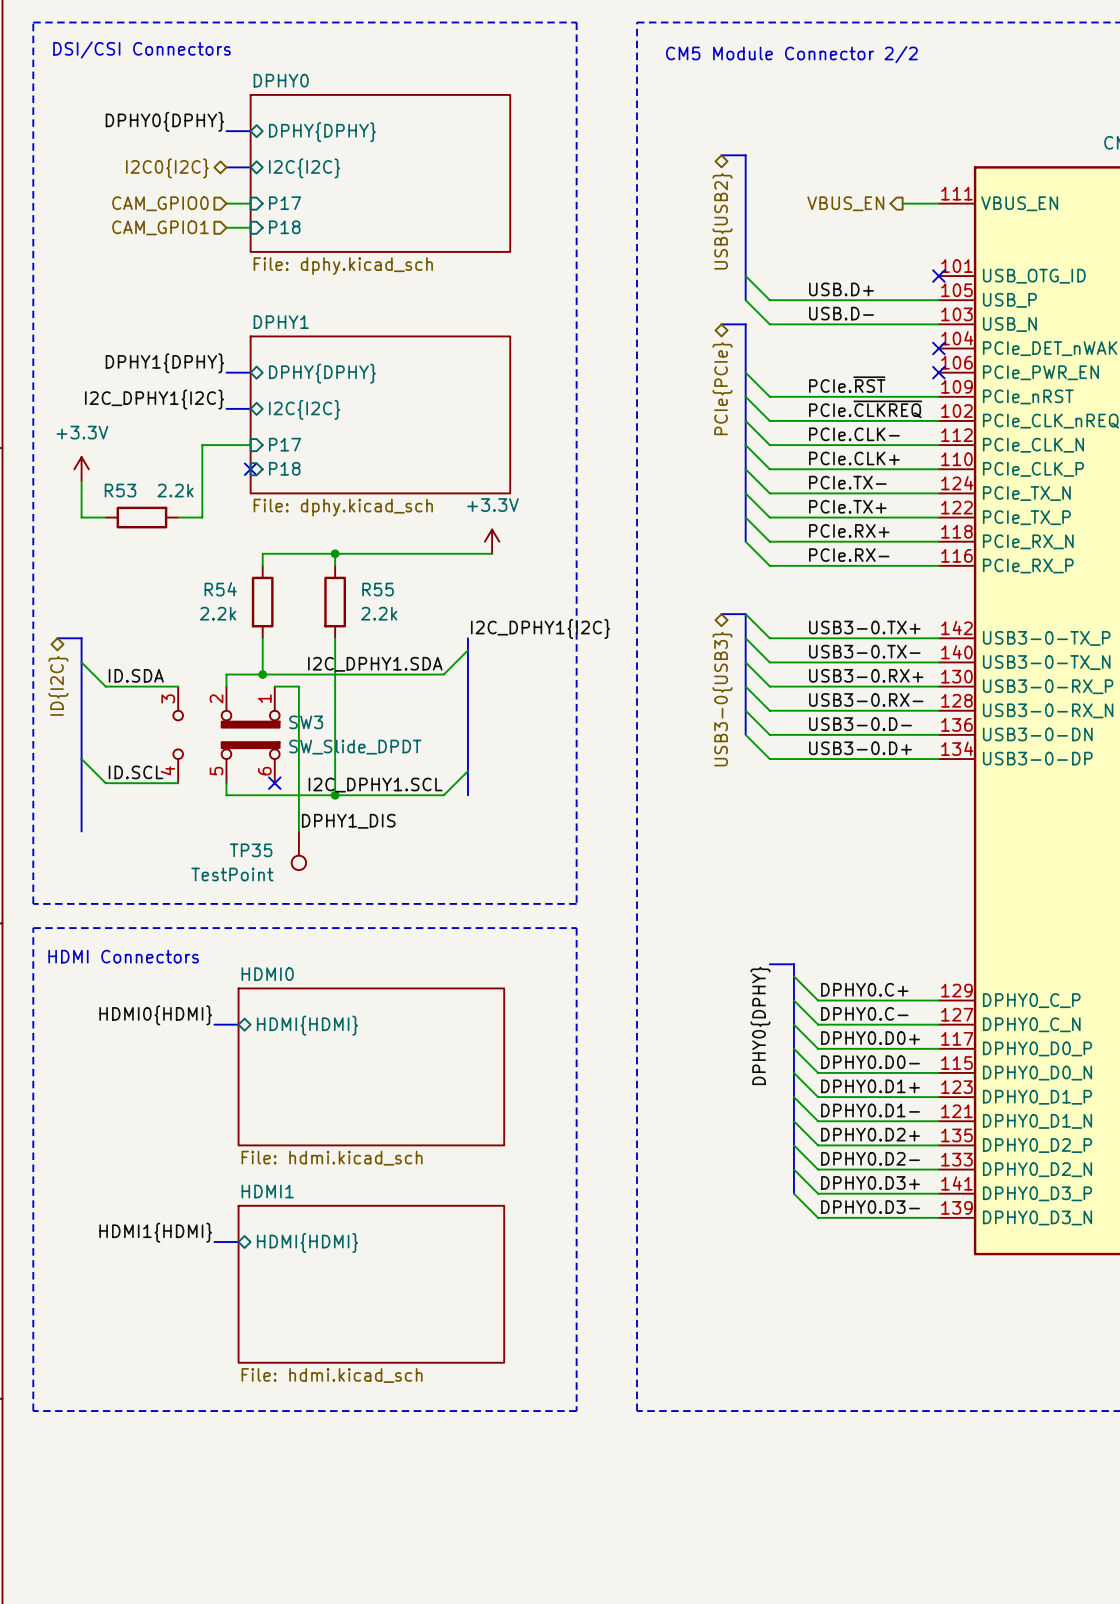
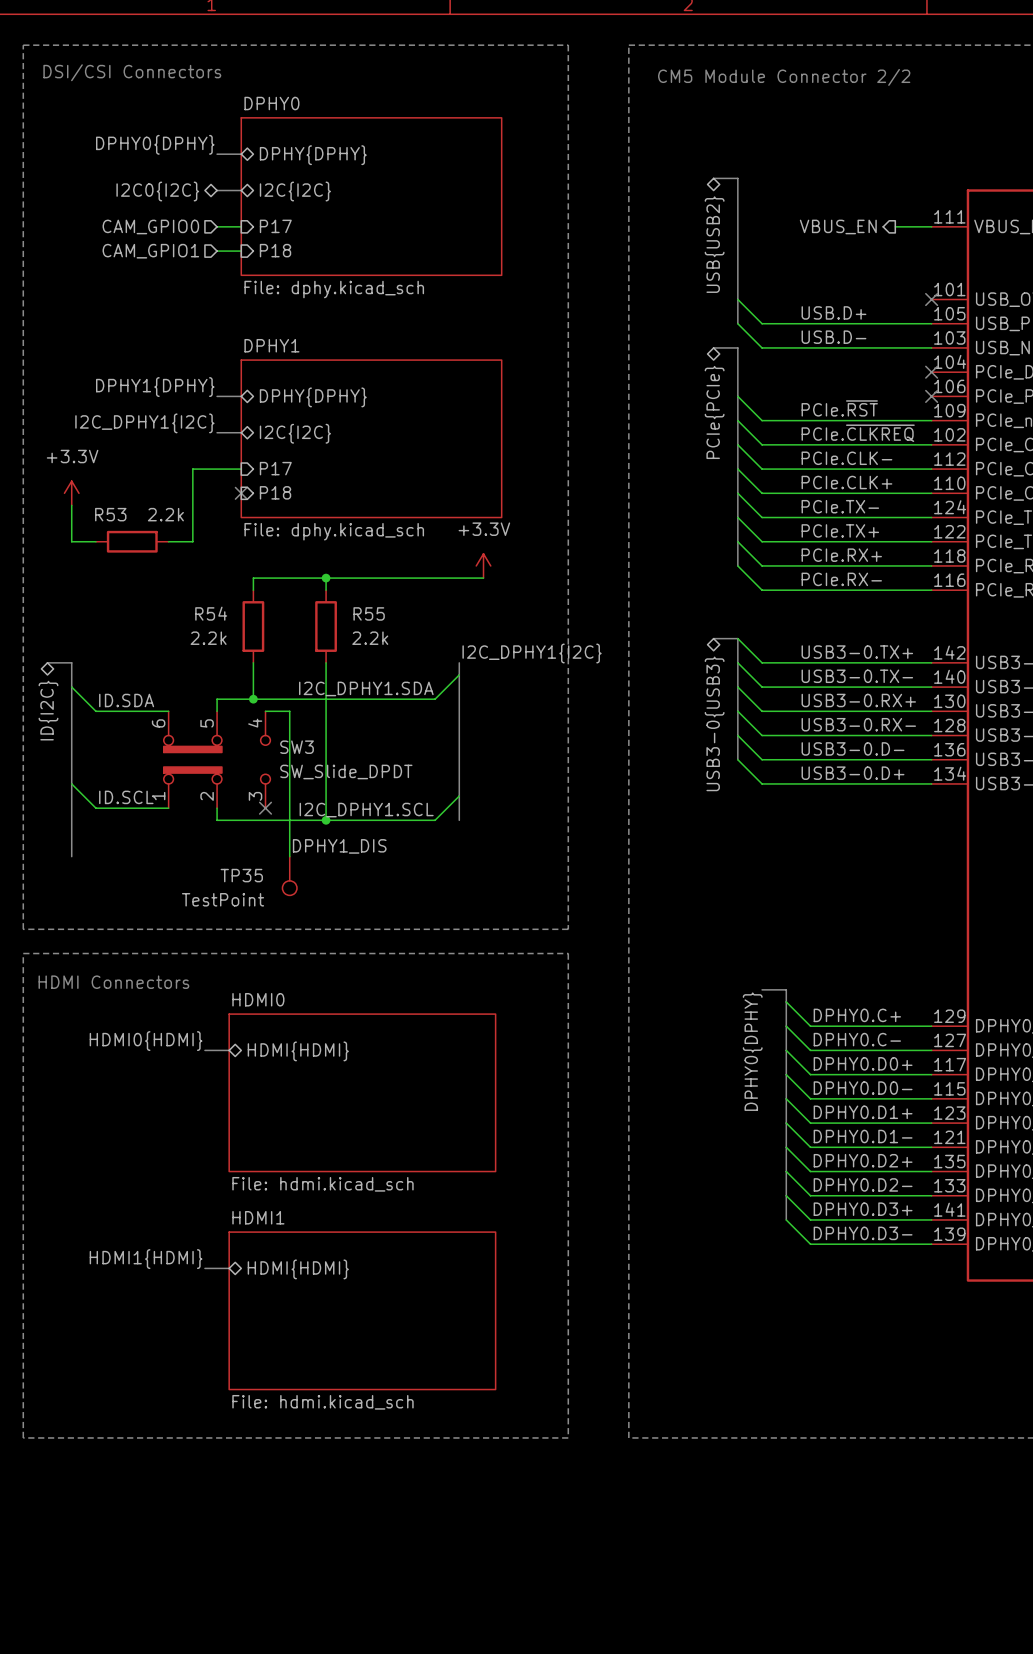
SW3 rotation: 0° (226, 734) -> 180° (217, 759)

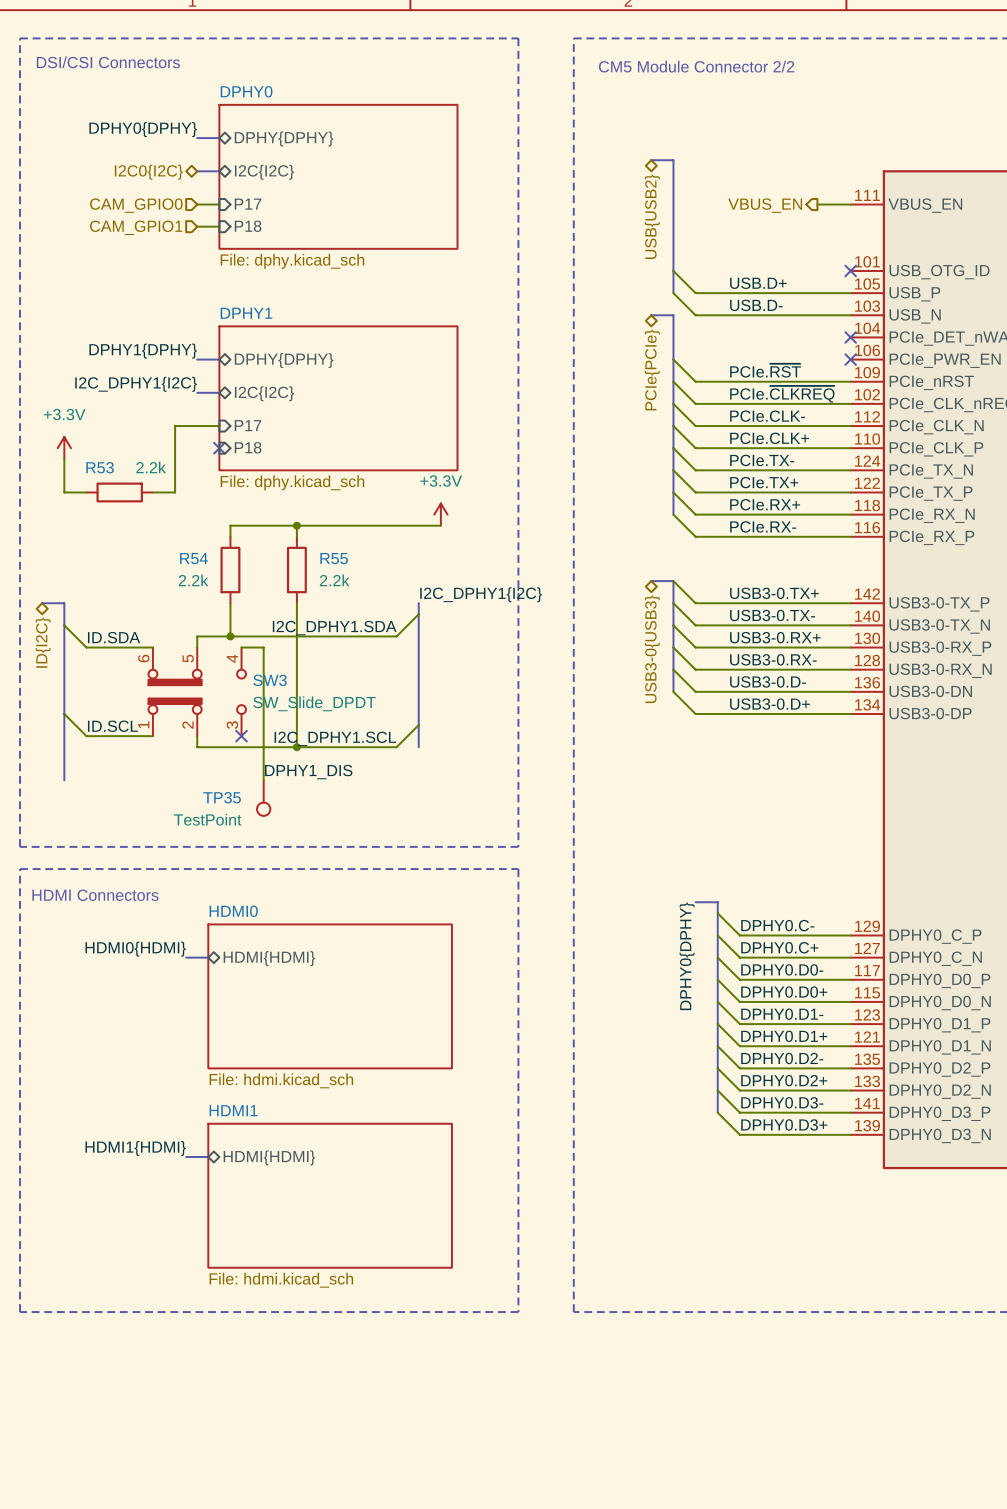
label: DPHY0.C+ (857, 1015) -> DPHY0.C- (777, 925)
label: DPHY0.C- (857, 1039) -> DPHY0.C+ (779, 947)
label: DPHY0.D0+ (863, 1063) -> DPHY0.D0- (782, 969)
label: DPHY0.D0- (863, 1088) -> DPHY0.D0+ (784, 992)
label: DPHY0.D1+ (863, 1112) -> DPHY0.D1- (782, 1014)
label: DPHY0.D1- (863, 1136) -> DPHY0.D1+ (784, 1036)
label: DPHY0.D2+ (863, 1160) -> DPHY0.D2- (782, 1058)
label: DPHY0.D2- (863, 1184) -> DPHY0.D2+ (784, 1080)
label: DPHY0.D3+ (863, 1209) -> DPHY0.D3- (782, 1102)
label: DPHY0.D3- (863, 1233) -> DPHY0.D3+ (784, 1124)

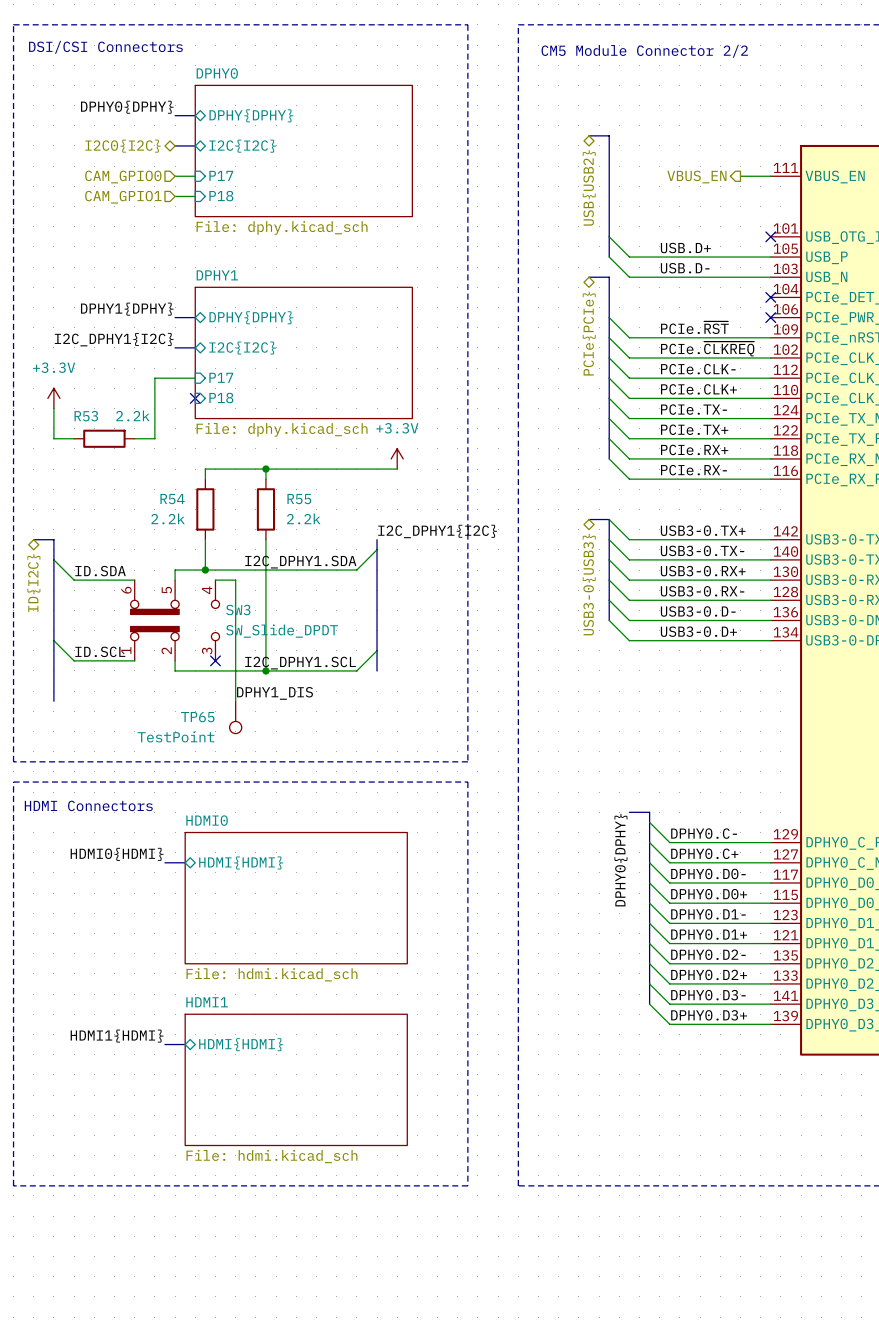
TP35 name: TP35 (222, 797) -> TP65 (197, 717)

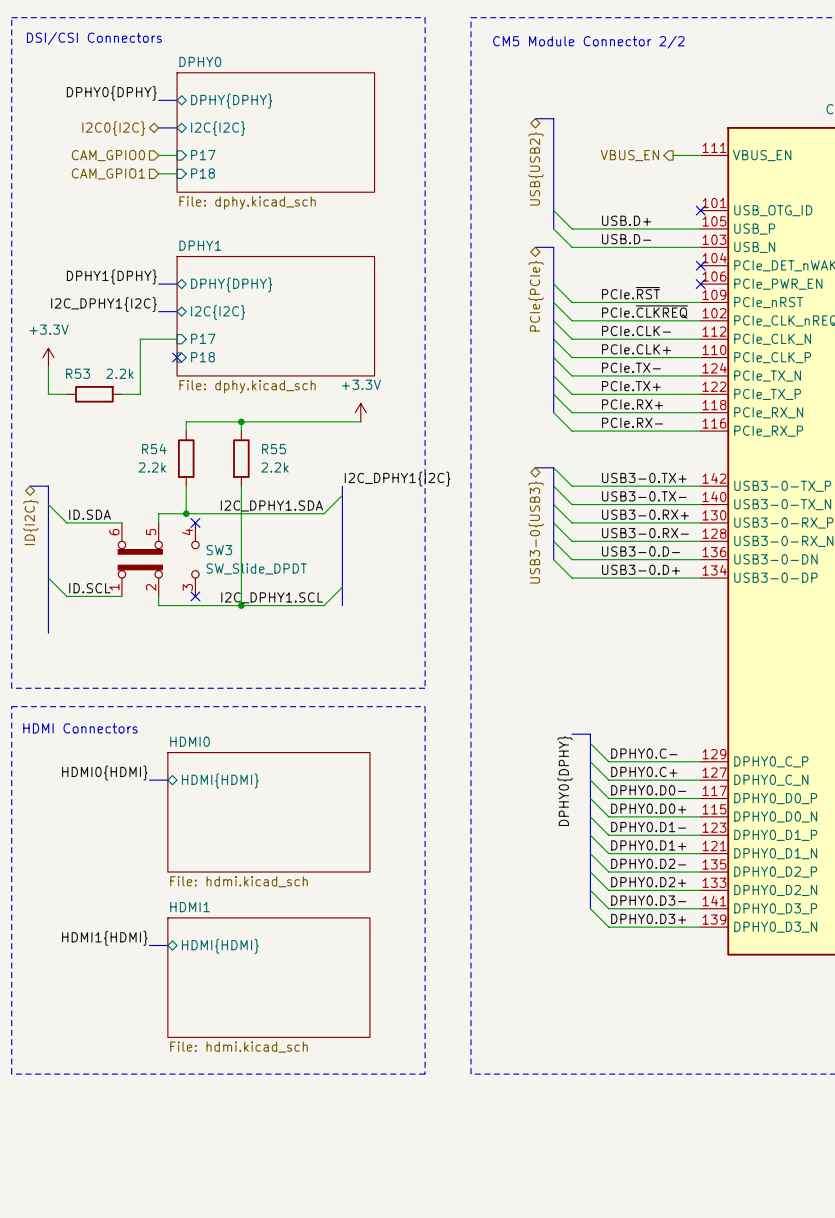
wire: (215, 580) (235, 580) (235, 701) -> none
no-connect mark: none -> (195, 522)
label: DPHY1_DIS (274, 693) -> none
TP65: TestPoint (235, 717) -> none

